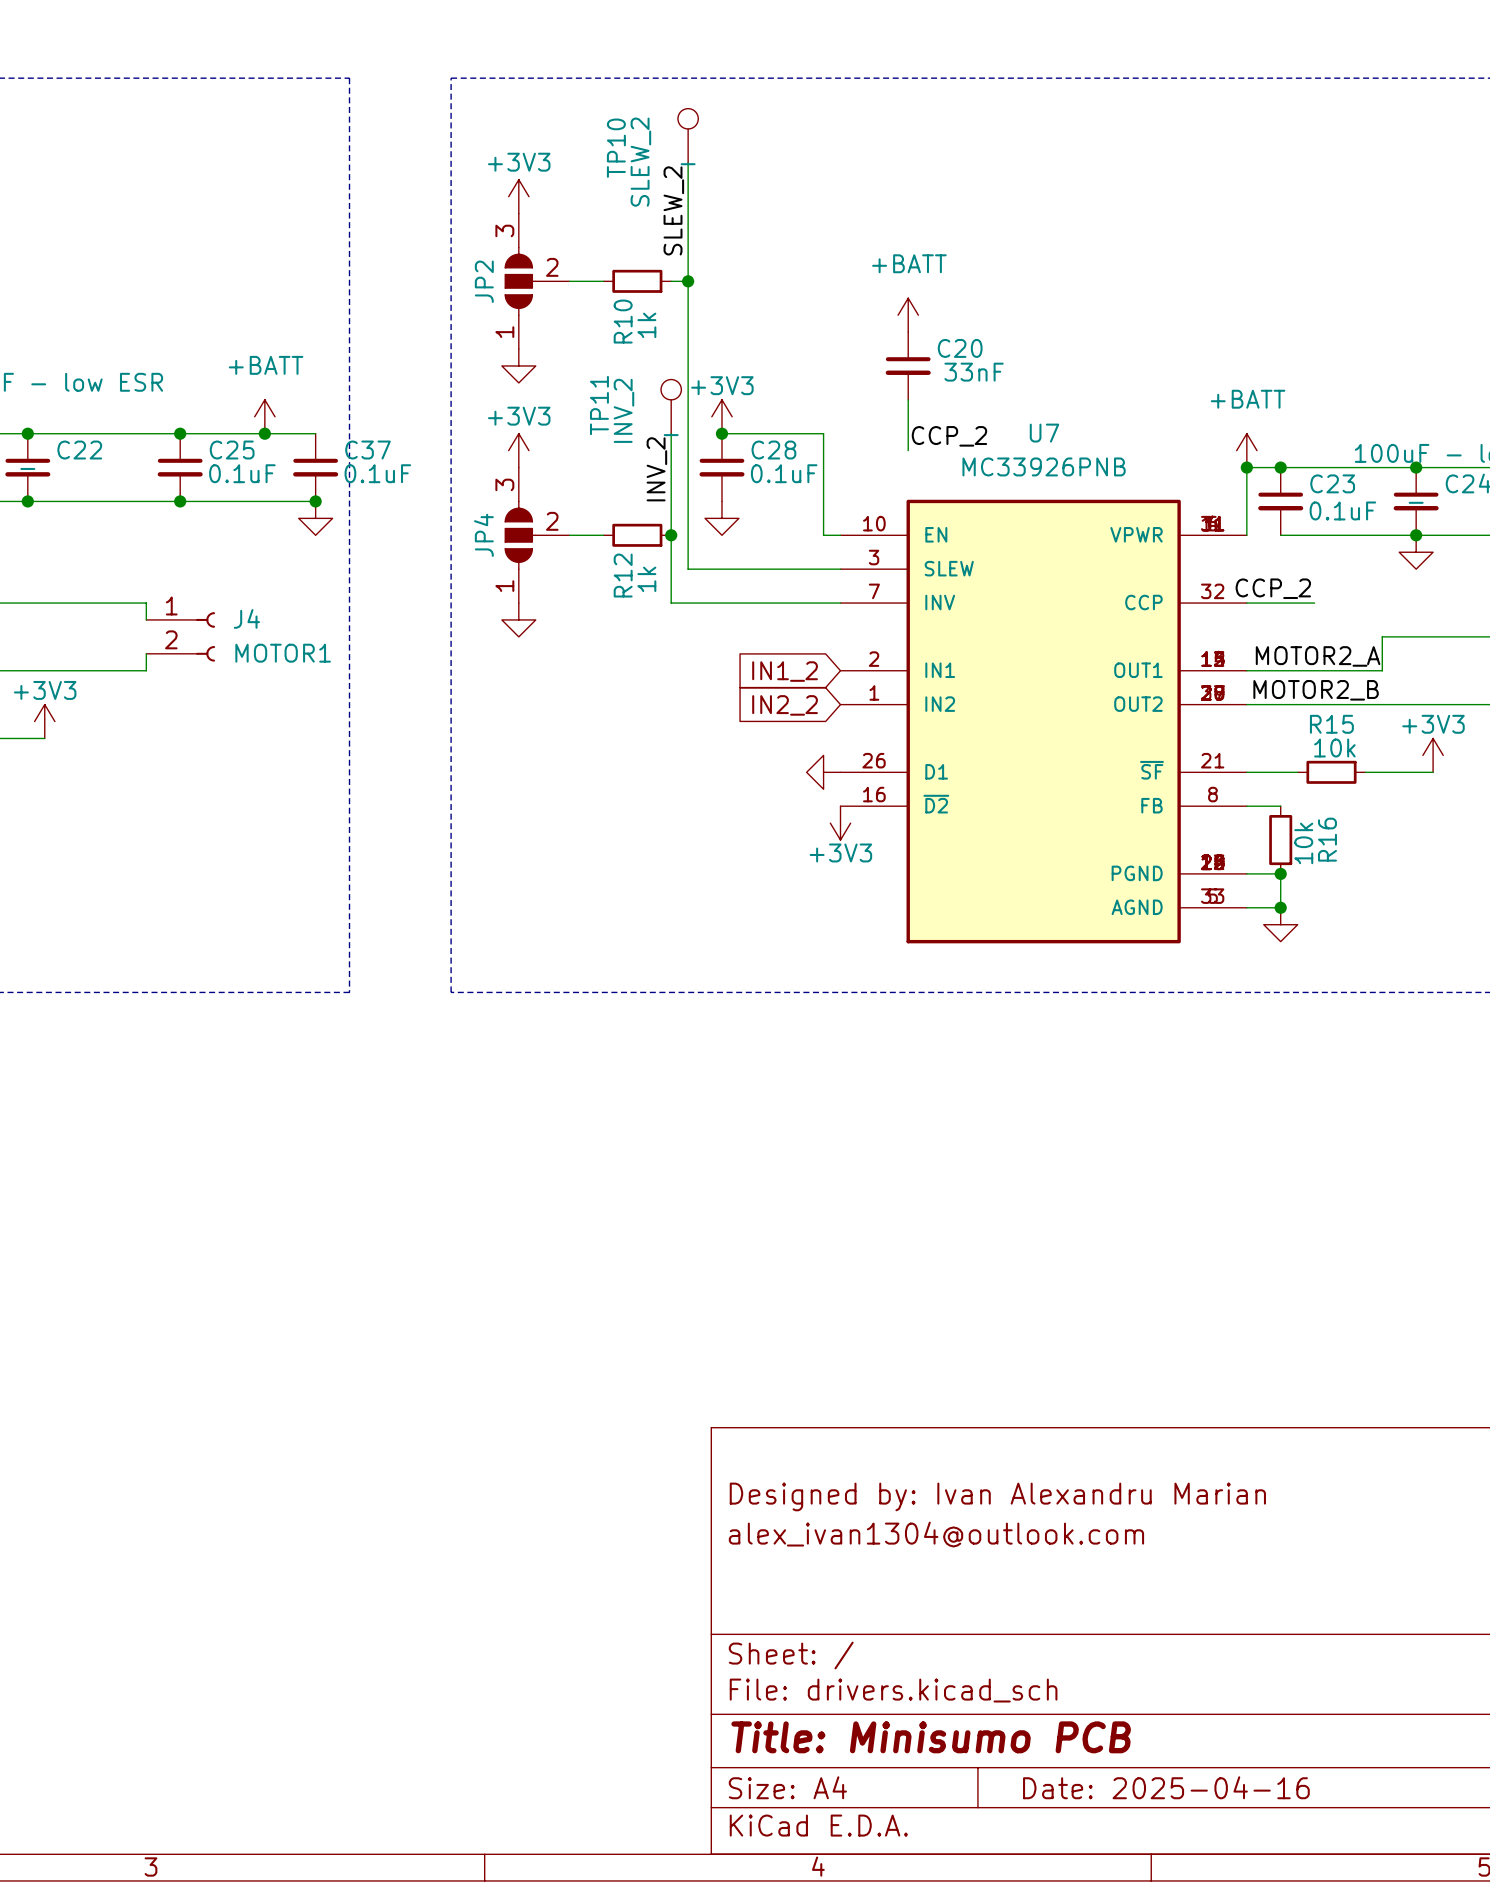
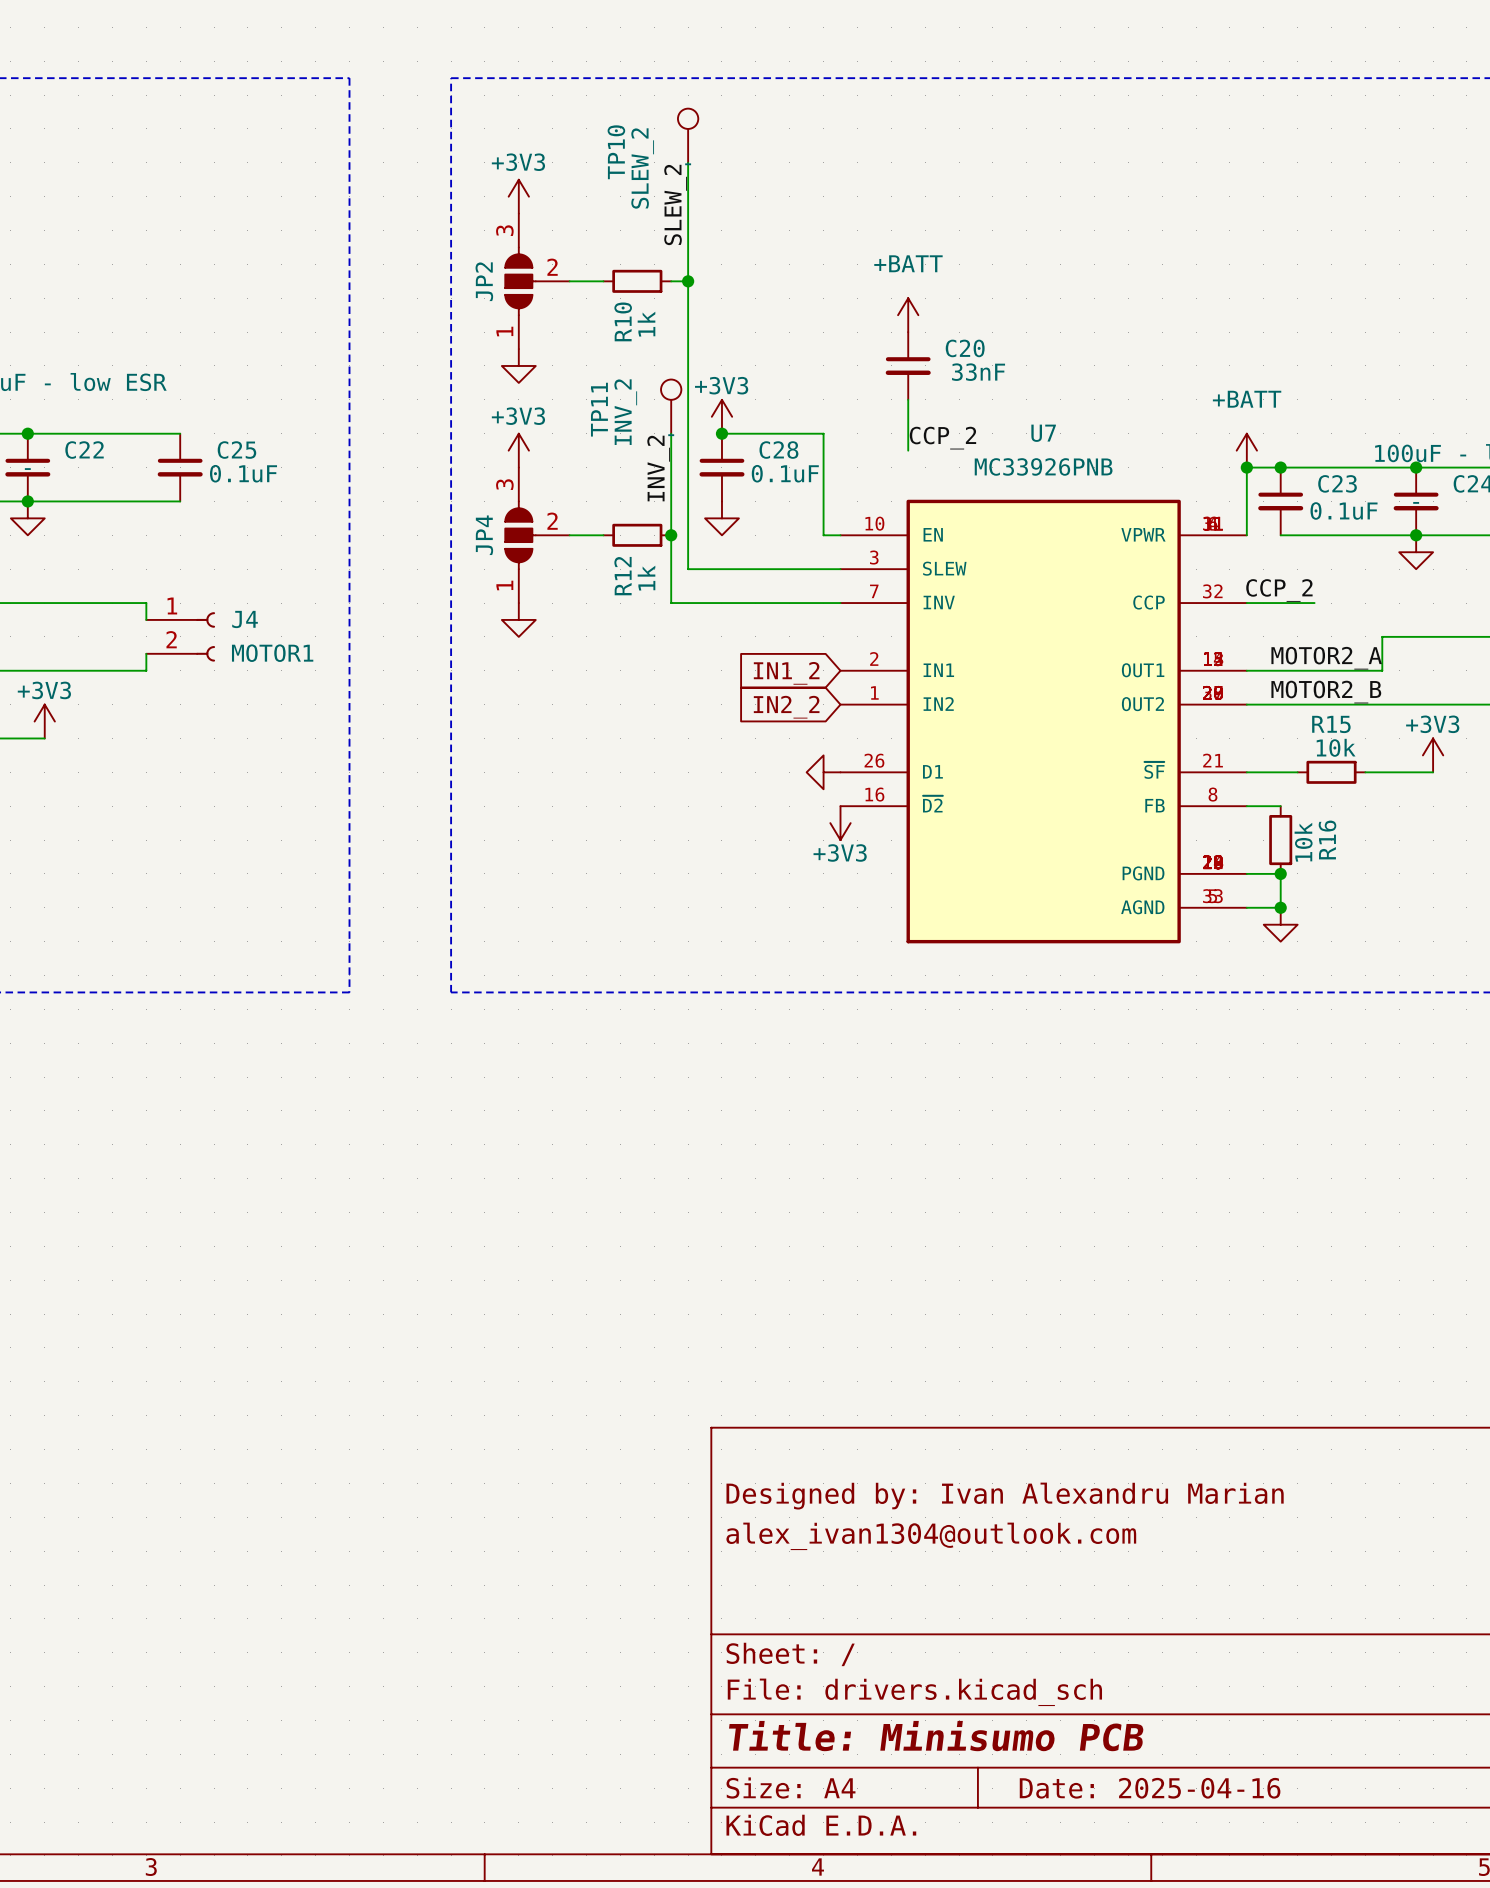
power symbol: +BATT (264, 416) -> none
wire: (180, 433) (315, 433) -> none
junction: (180, 433) -> none
junction: (264, 433) -> none
C37: 0.1uF (315, 467) -> none
wire: (180, 501) (315, 501) -> none
junction: (180, 501) -> none
junction: (315, 501) -> none
power symbol position: (315, 518) -> (27, 518)

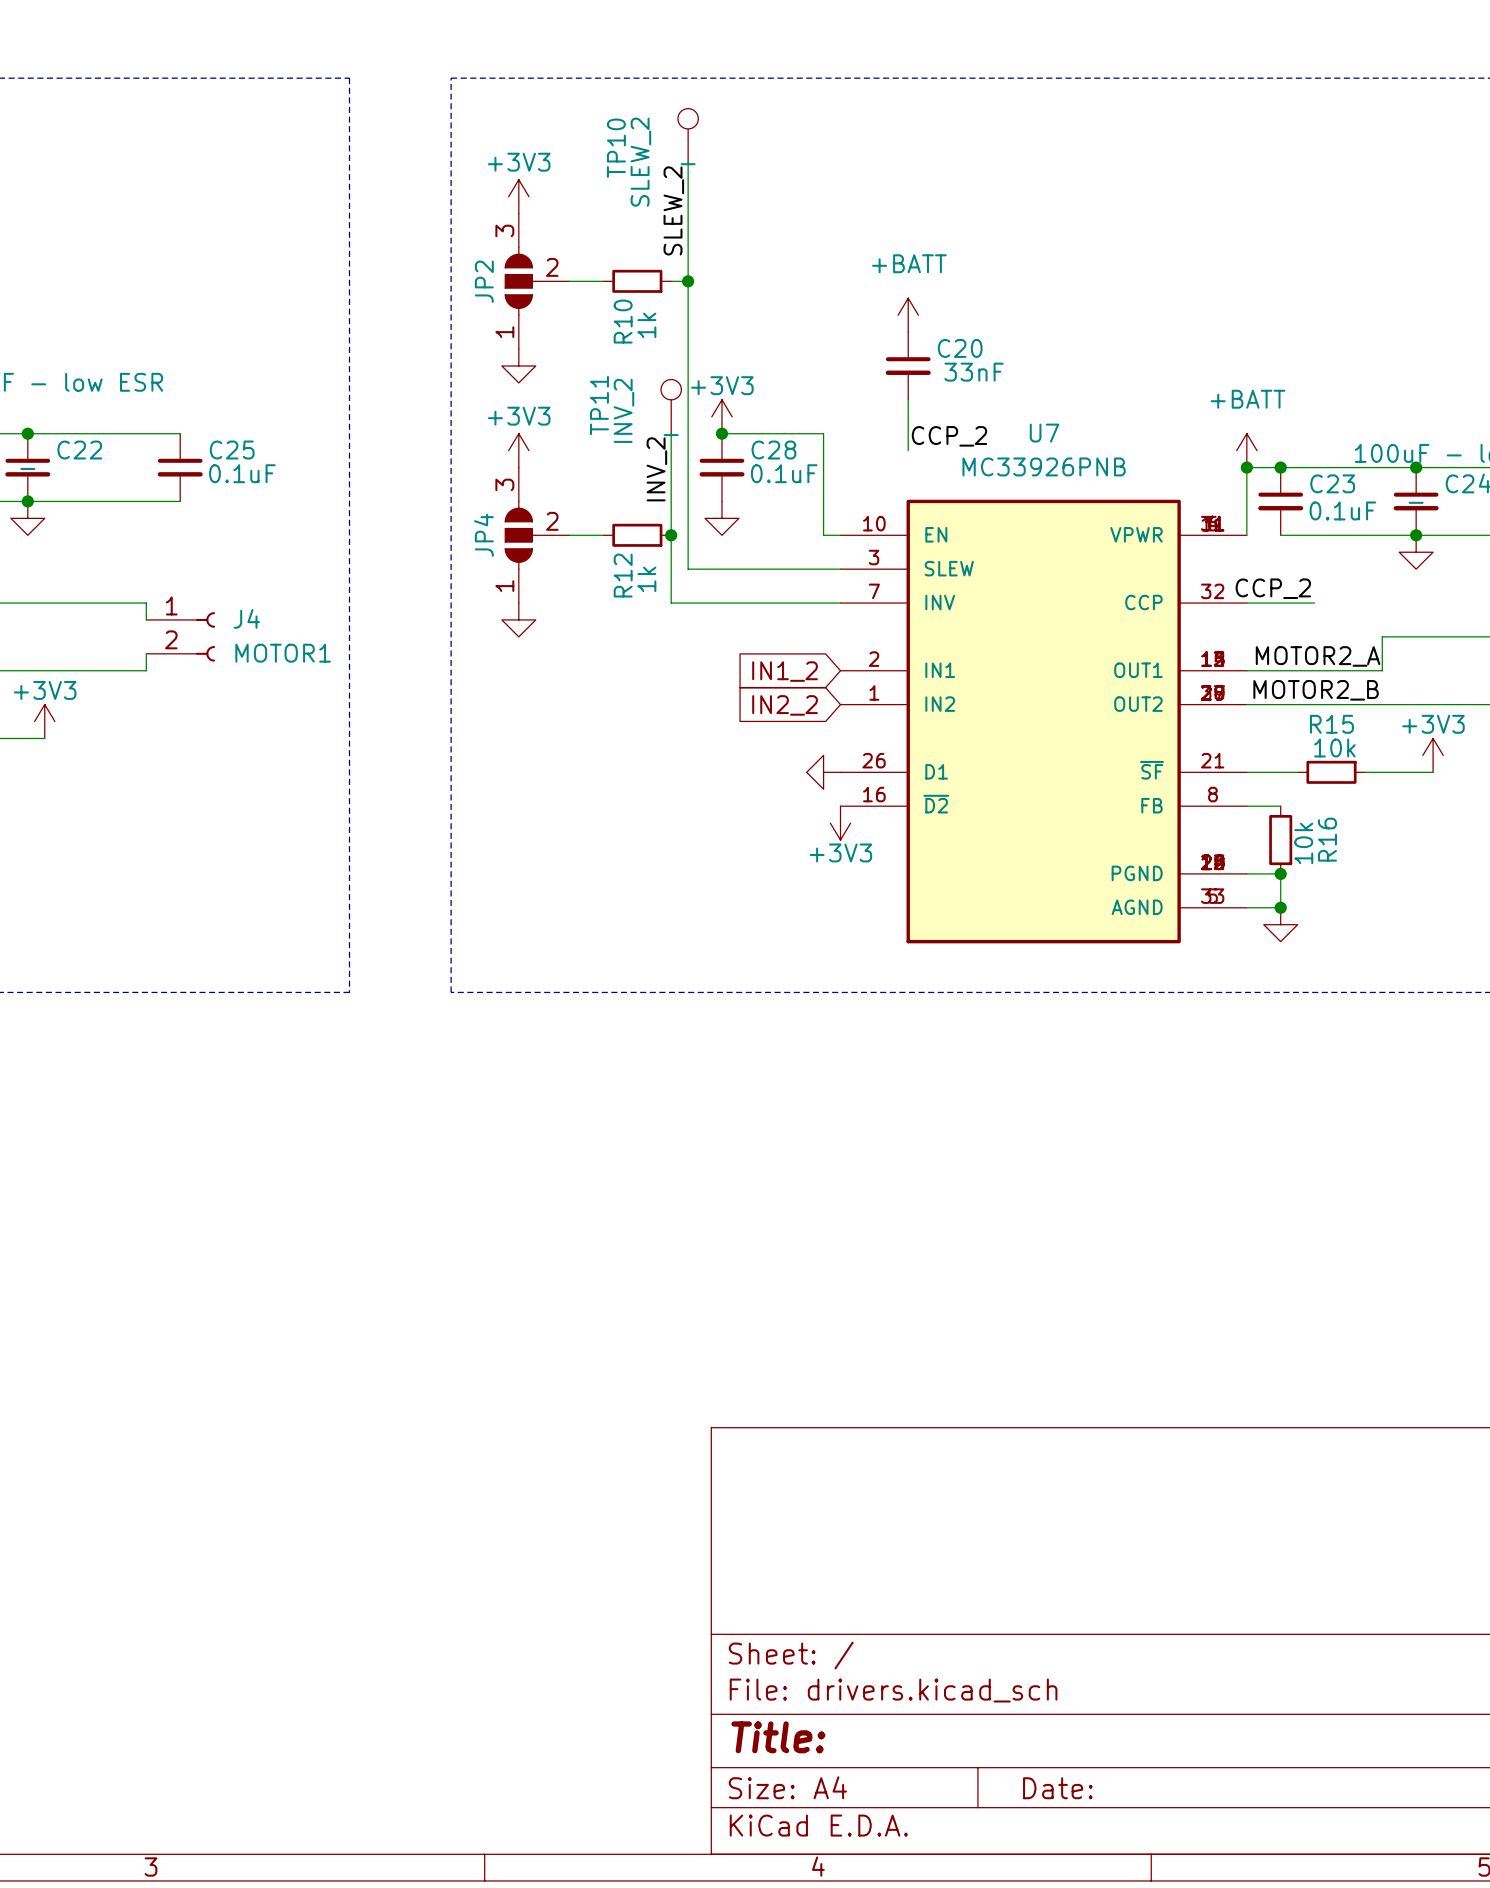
title block: Designed by: Ivan Alexandru Marian (1005, 1496) -> none
title block: alex_ivan1304@outlook.com (931, 1536) -> none
title block: Title: Minisumo PCB (936, 1736) -> Title: (778, 1737)
title block: Date: 2025-04-16 (1150, 1788) -> Date: (1057, 1788)

